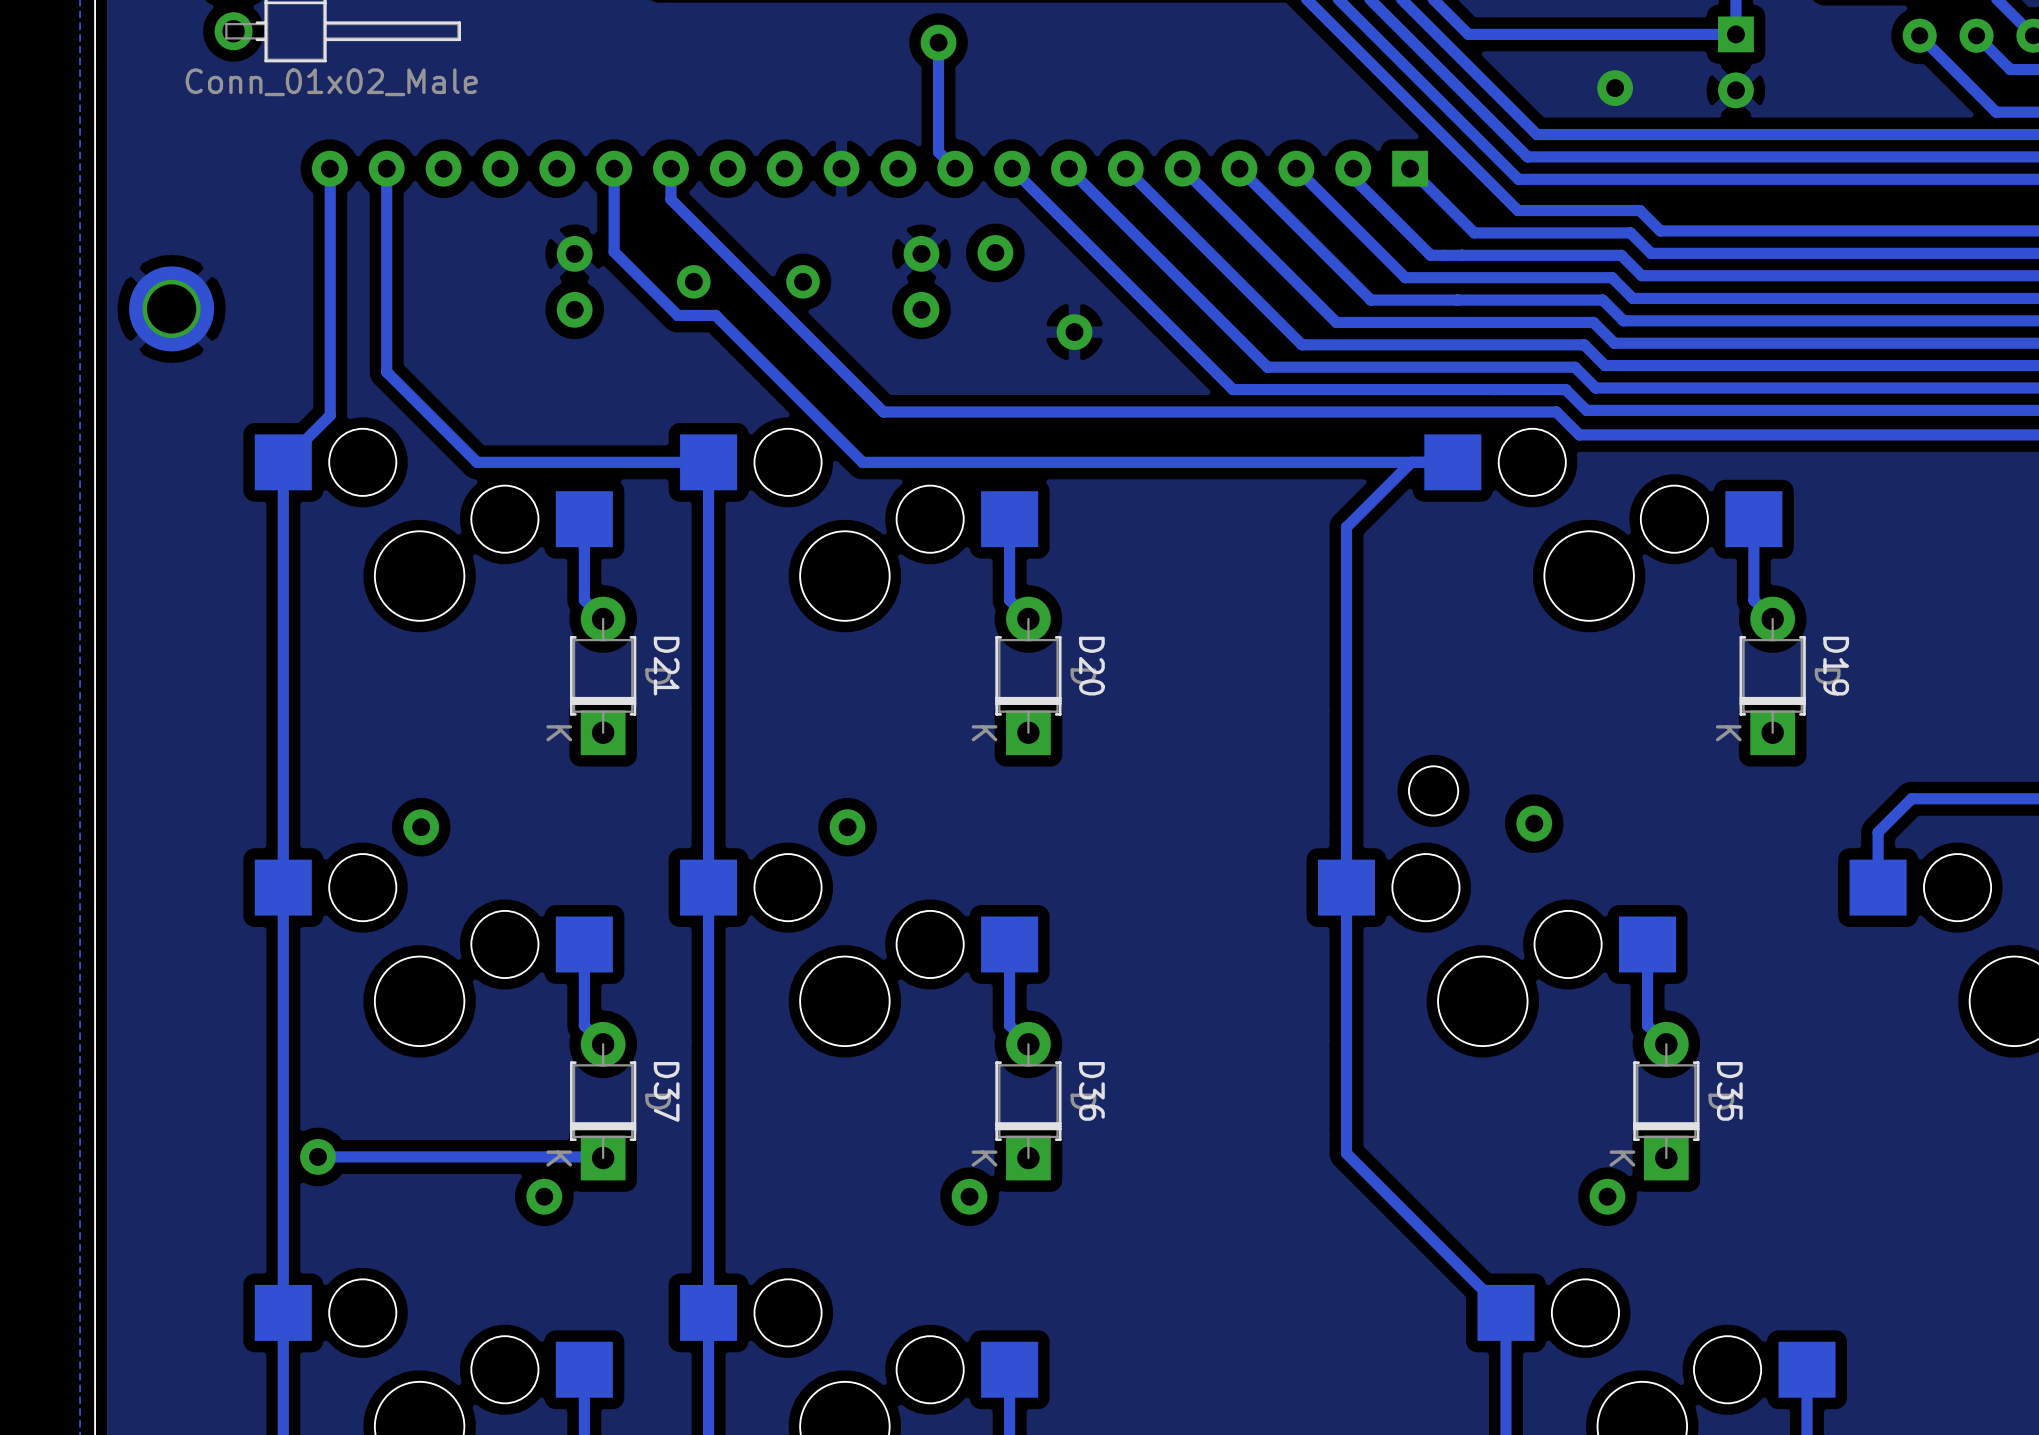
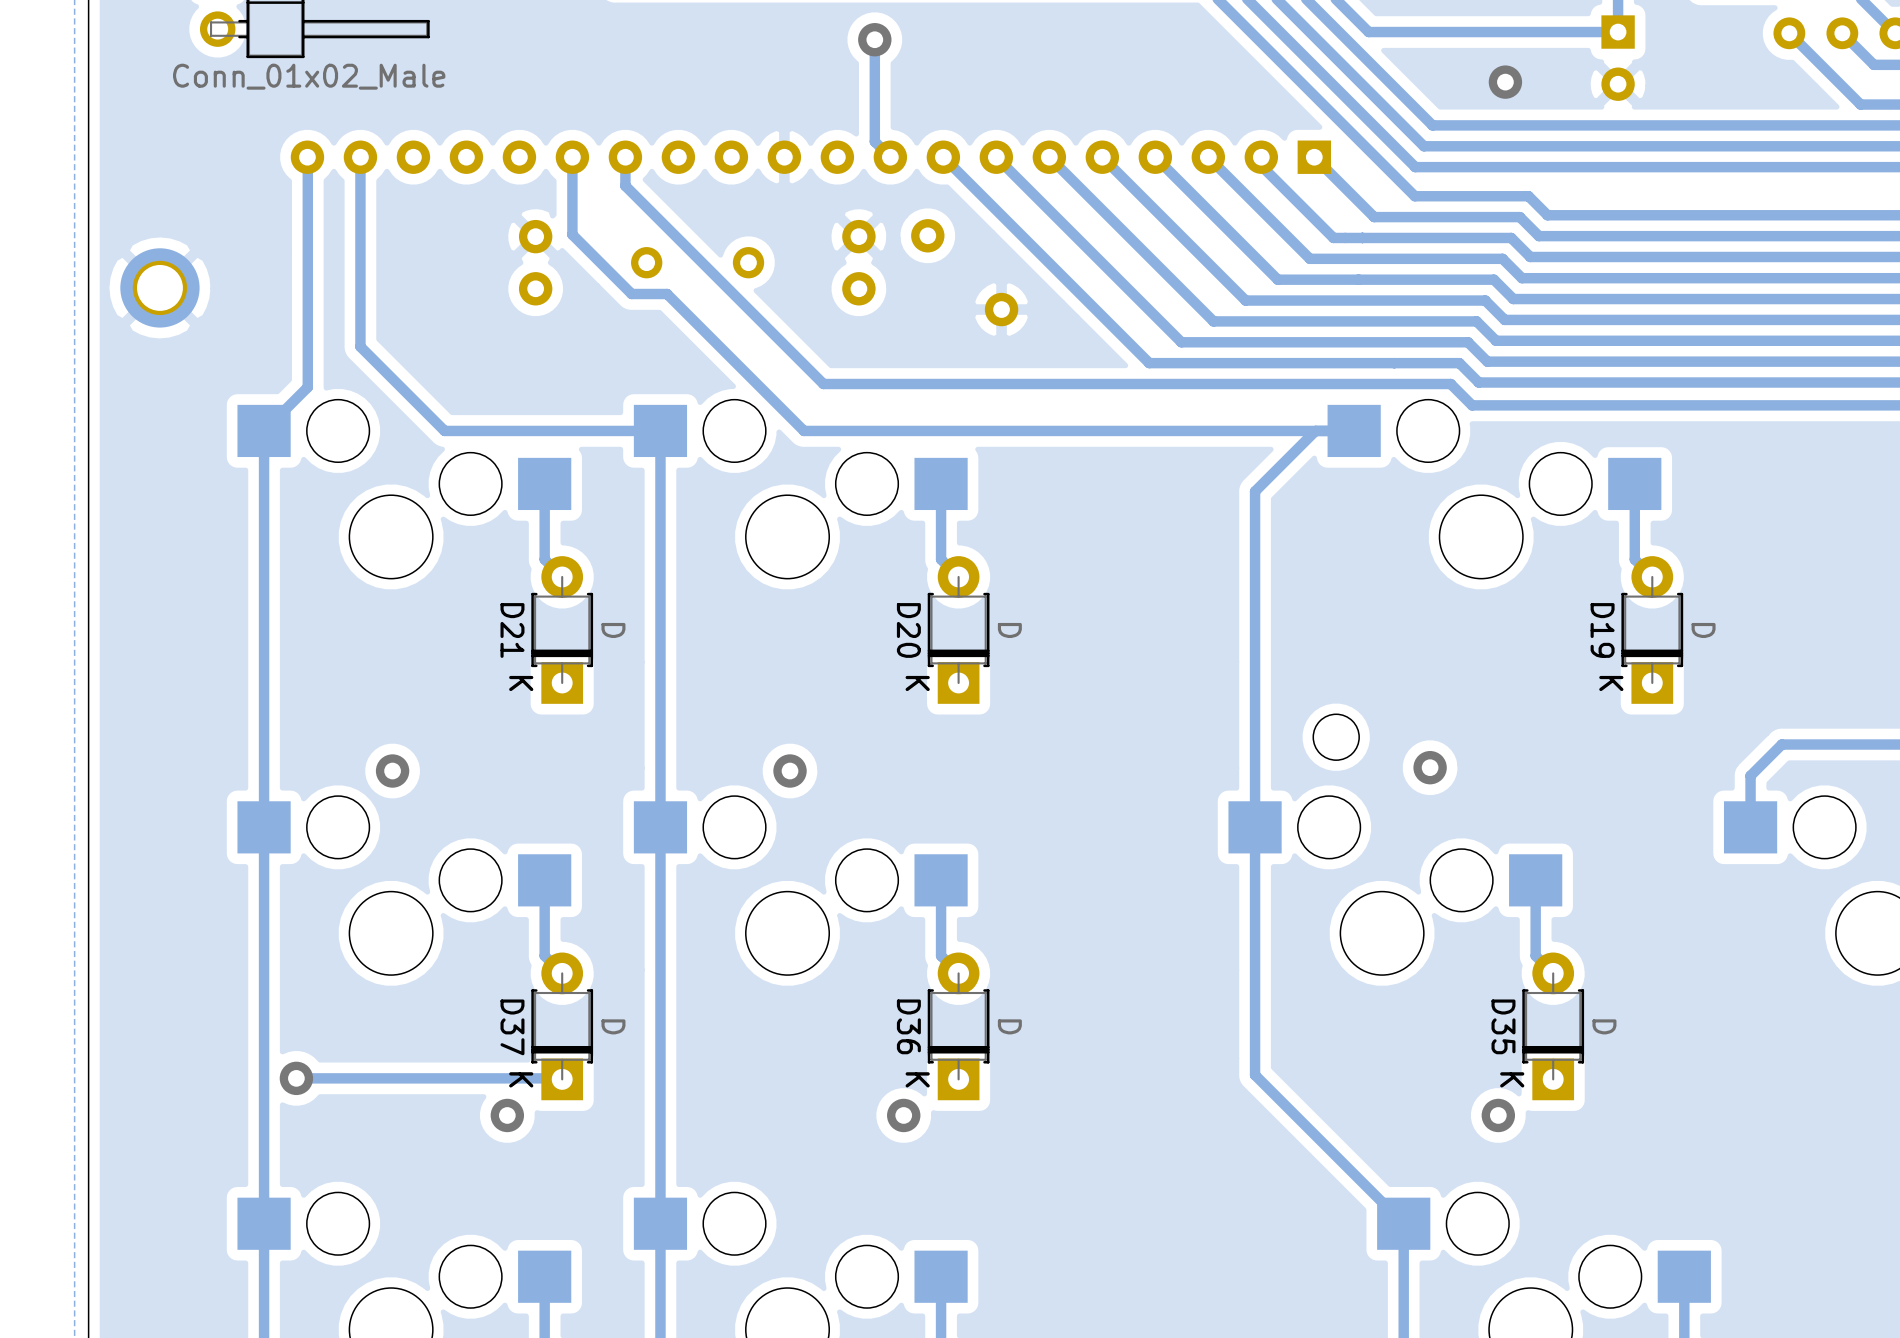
D21 name position: D21 (666, 666) -> D21 (512, 630)
D20 name position: D20 (1091, 666) -> D20 (908, 630)
D19 name position: D19 (1836, 666) -> D19 (1602, 630)
D37 name position: D37 (666, 1091) -> D37 (512, 1027)
D36 name position: D36 (1091, 1091) -> D36 (908, 1026)
D35 name position: D35 (1729, 1091) -> D35 (1503, 1026)

